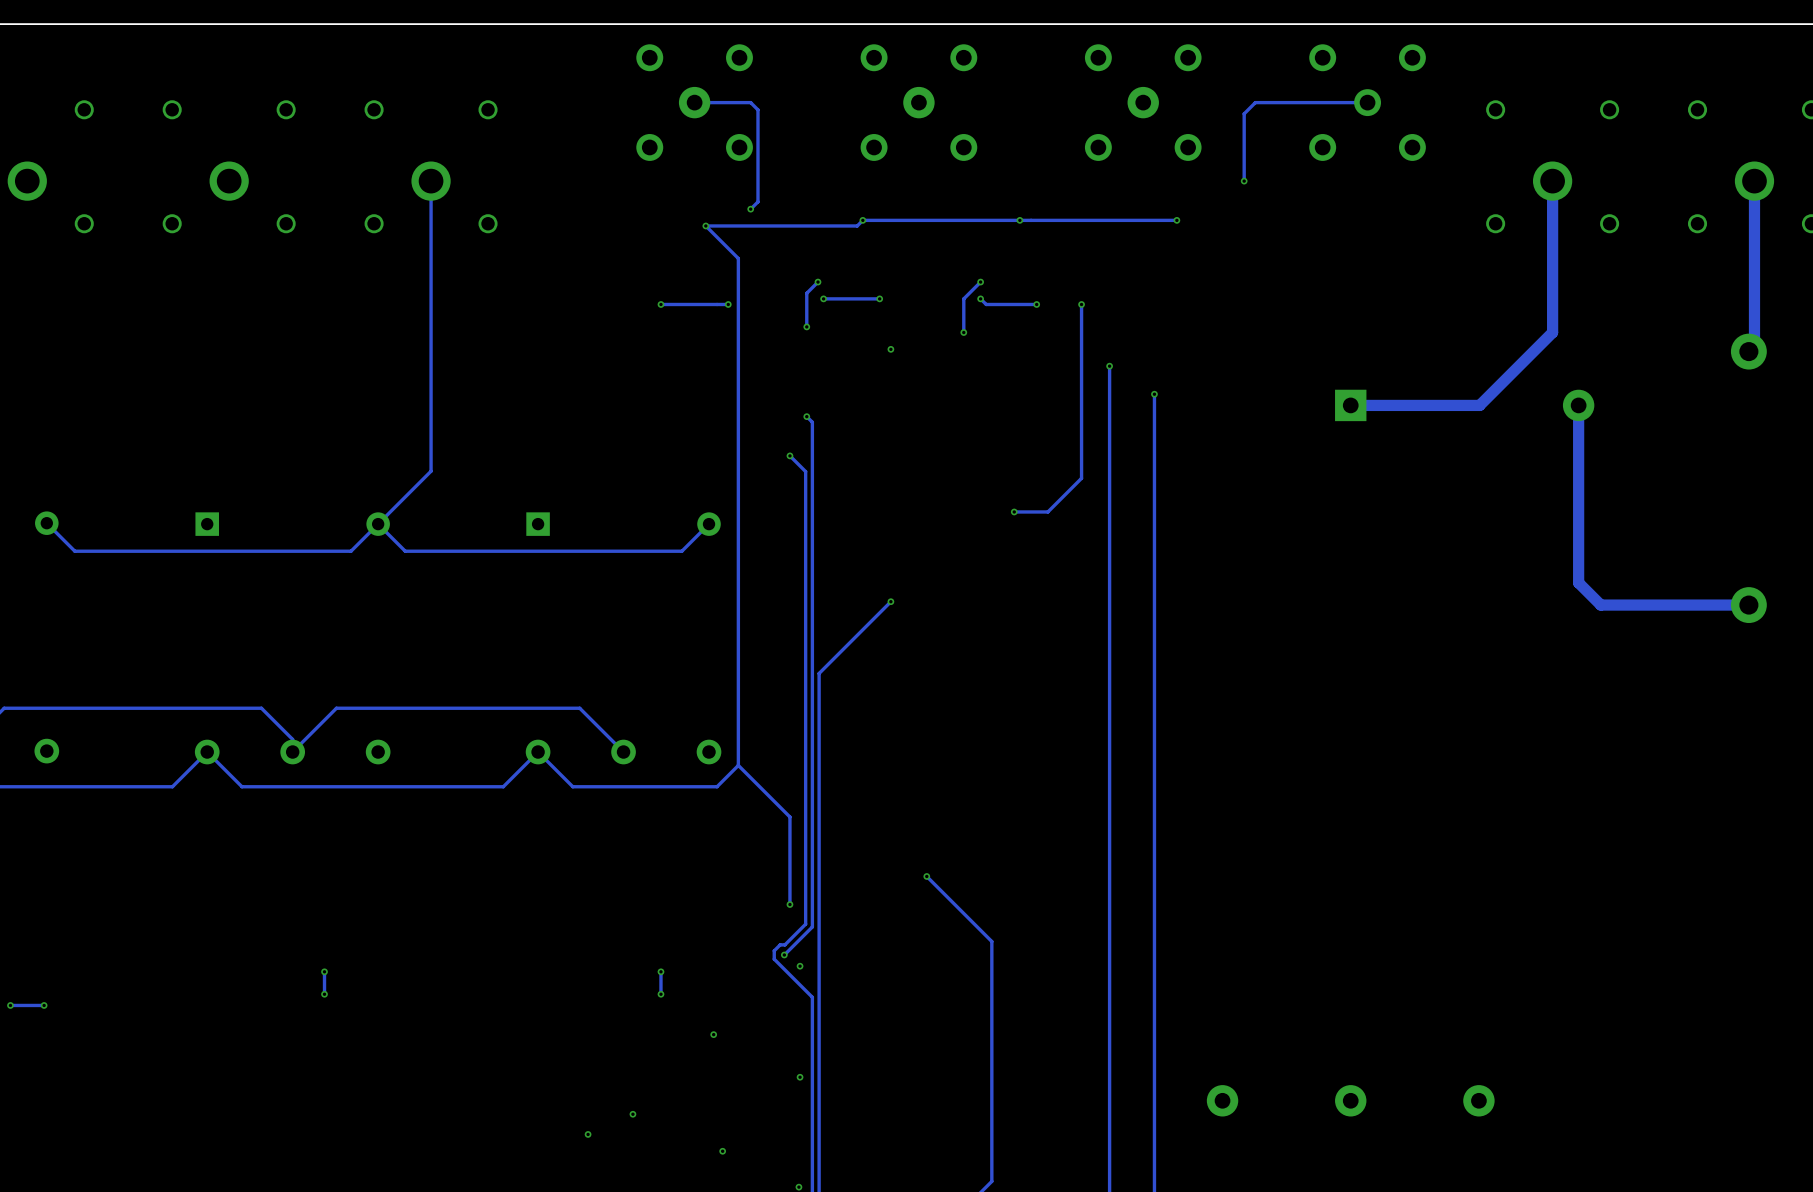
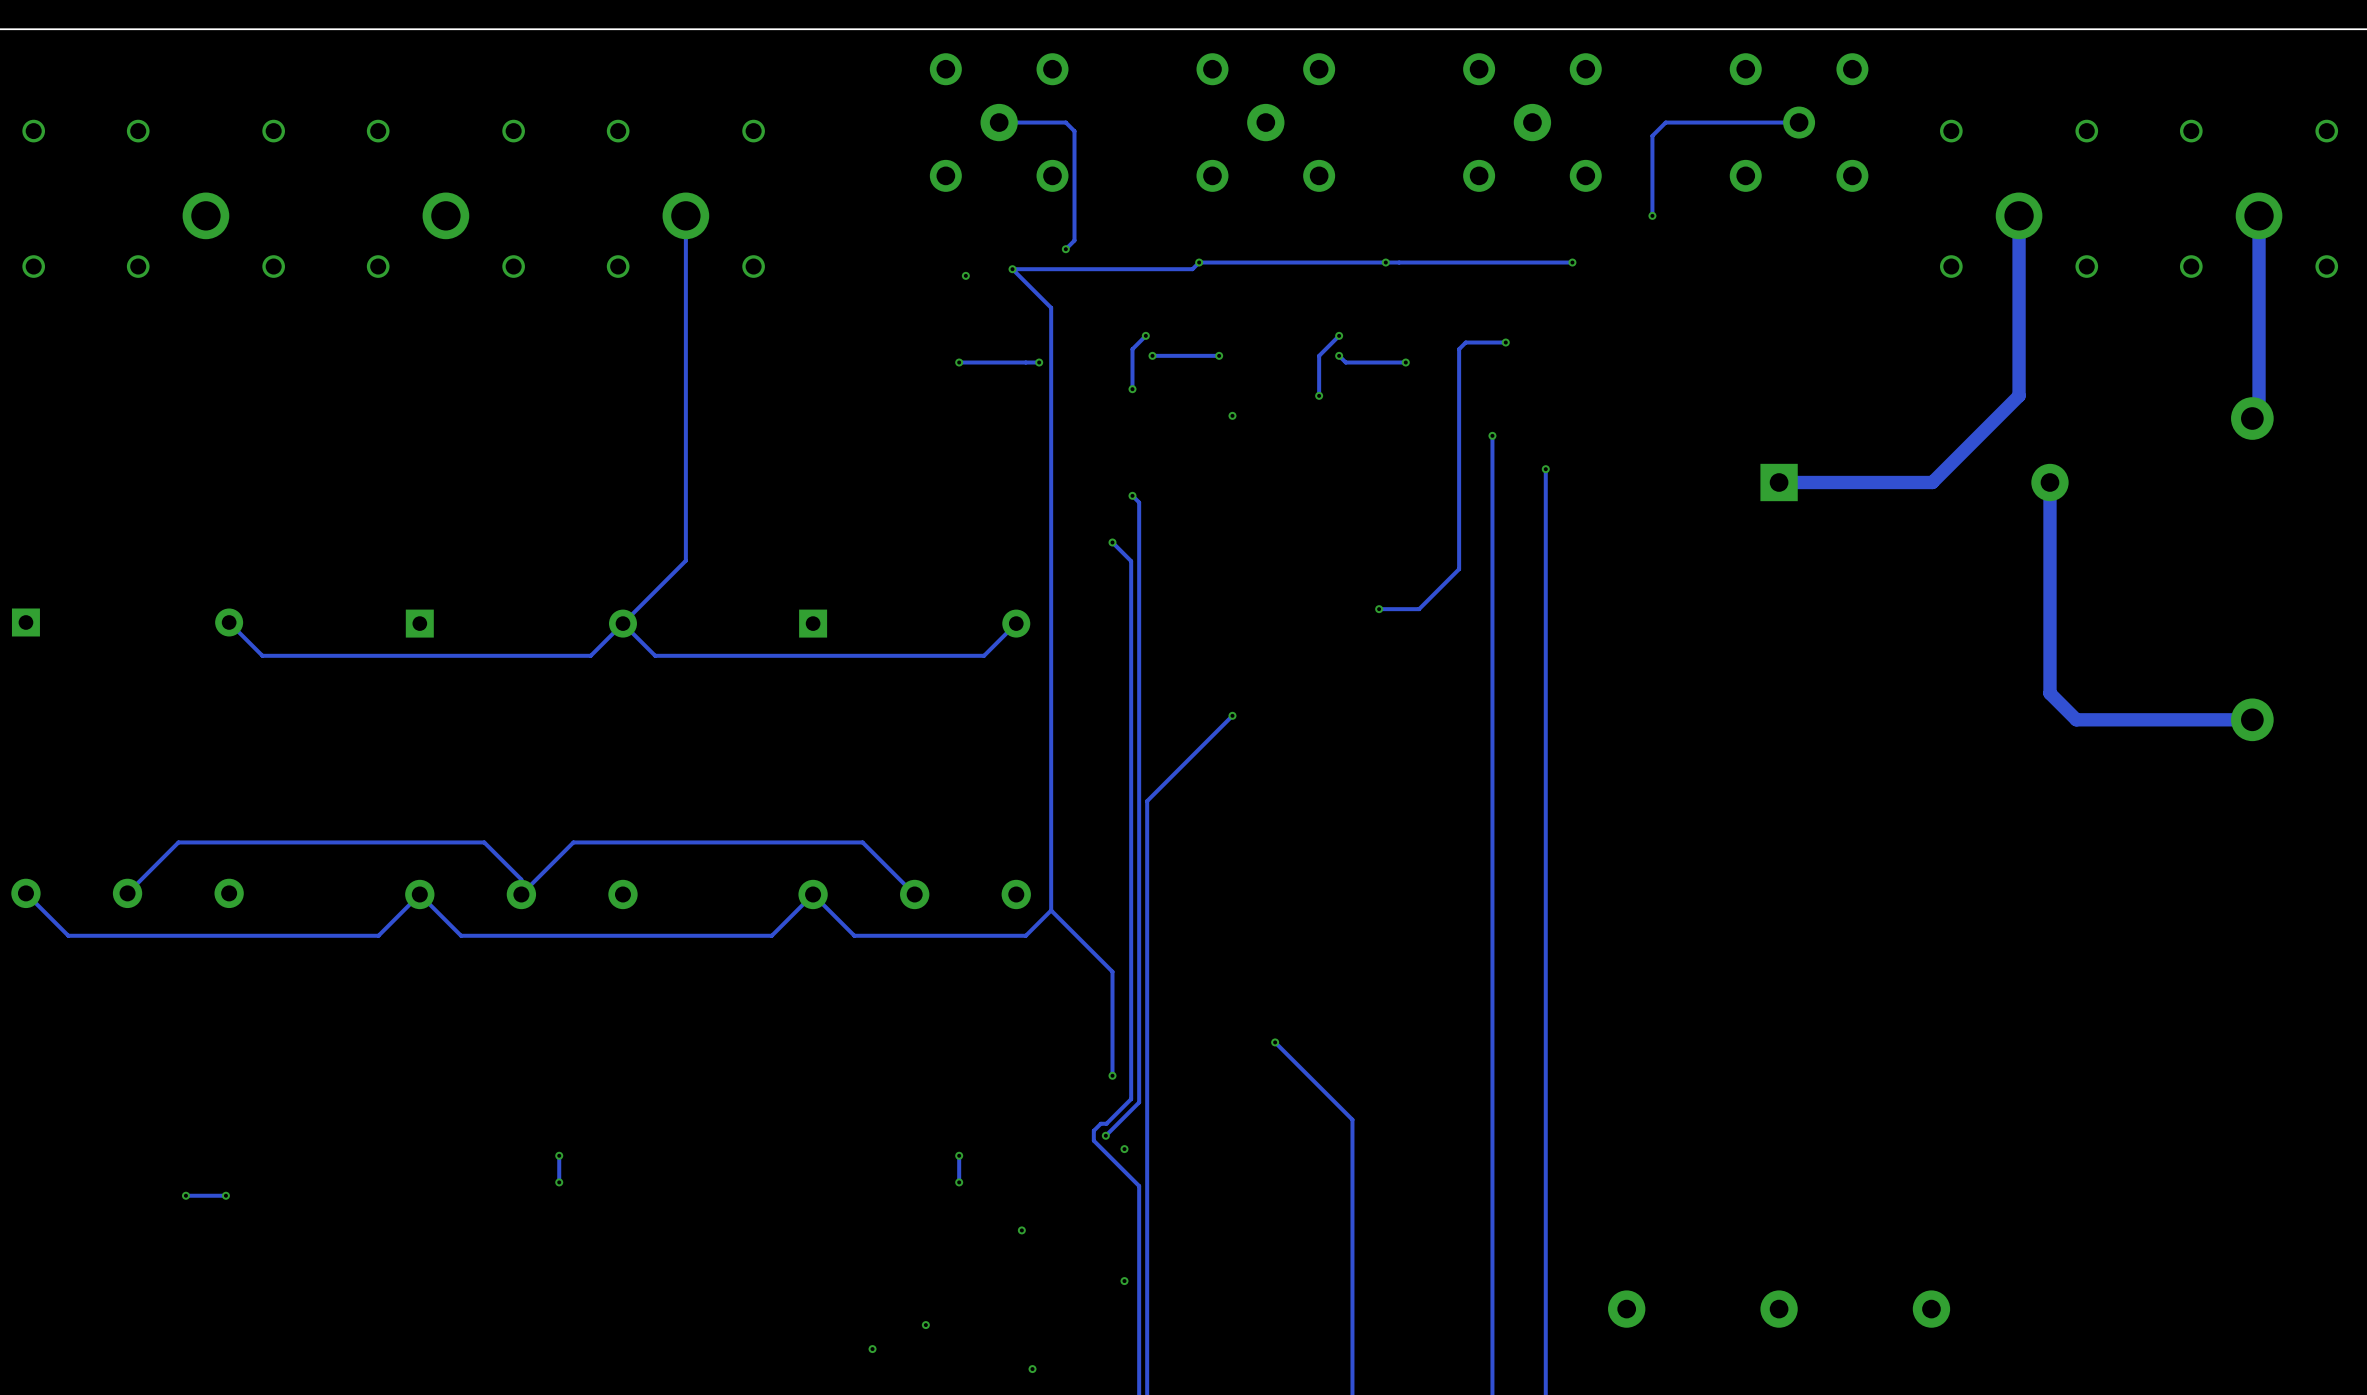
via: none -> (965, 275)
track: none -> (1505, 342) (1465, 342) (1459, 349) (1459, 362)
via position: (1081, 304) -> (1505, 342)

